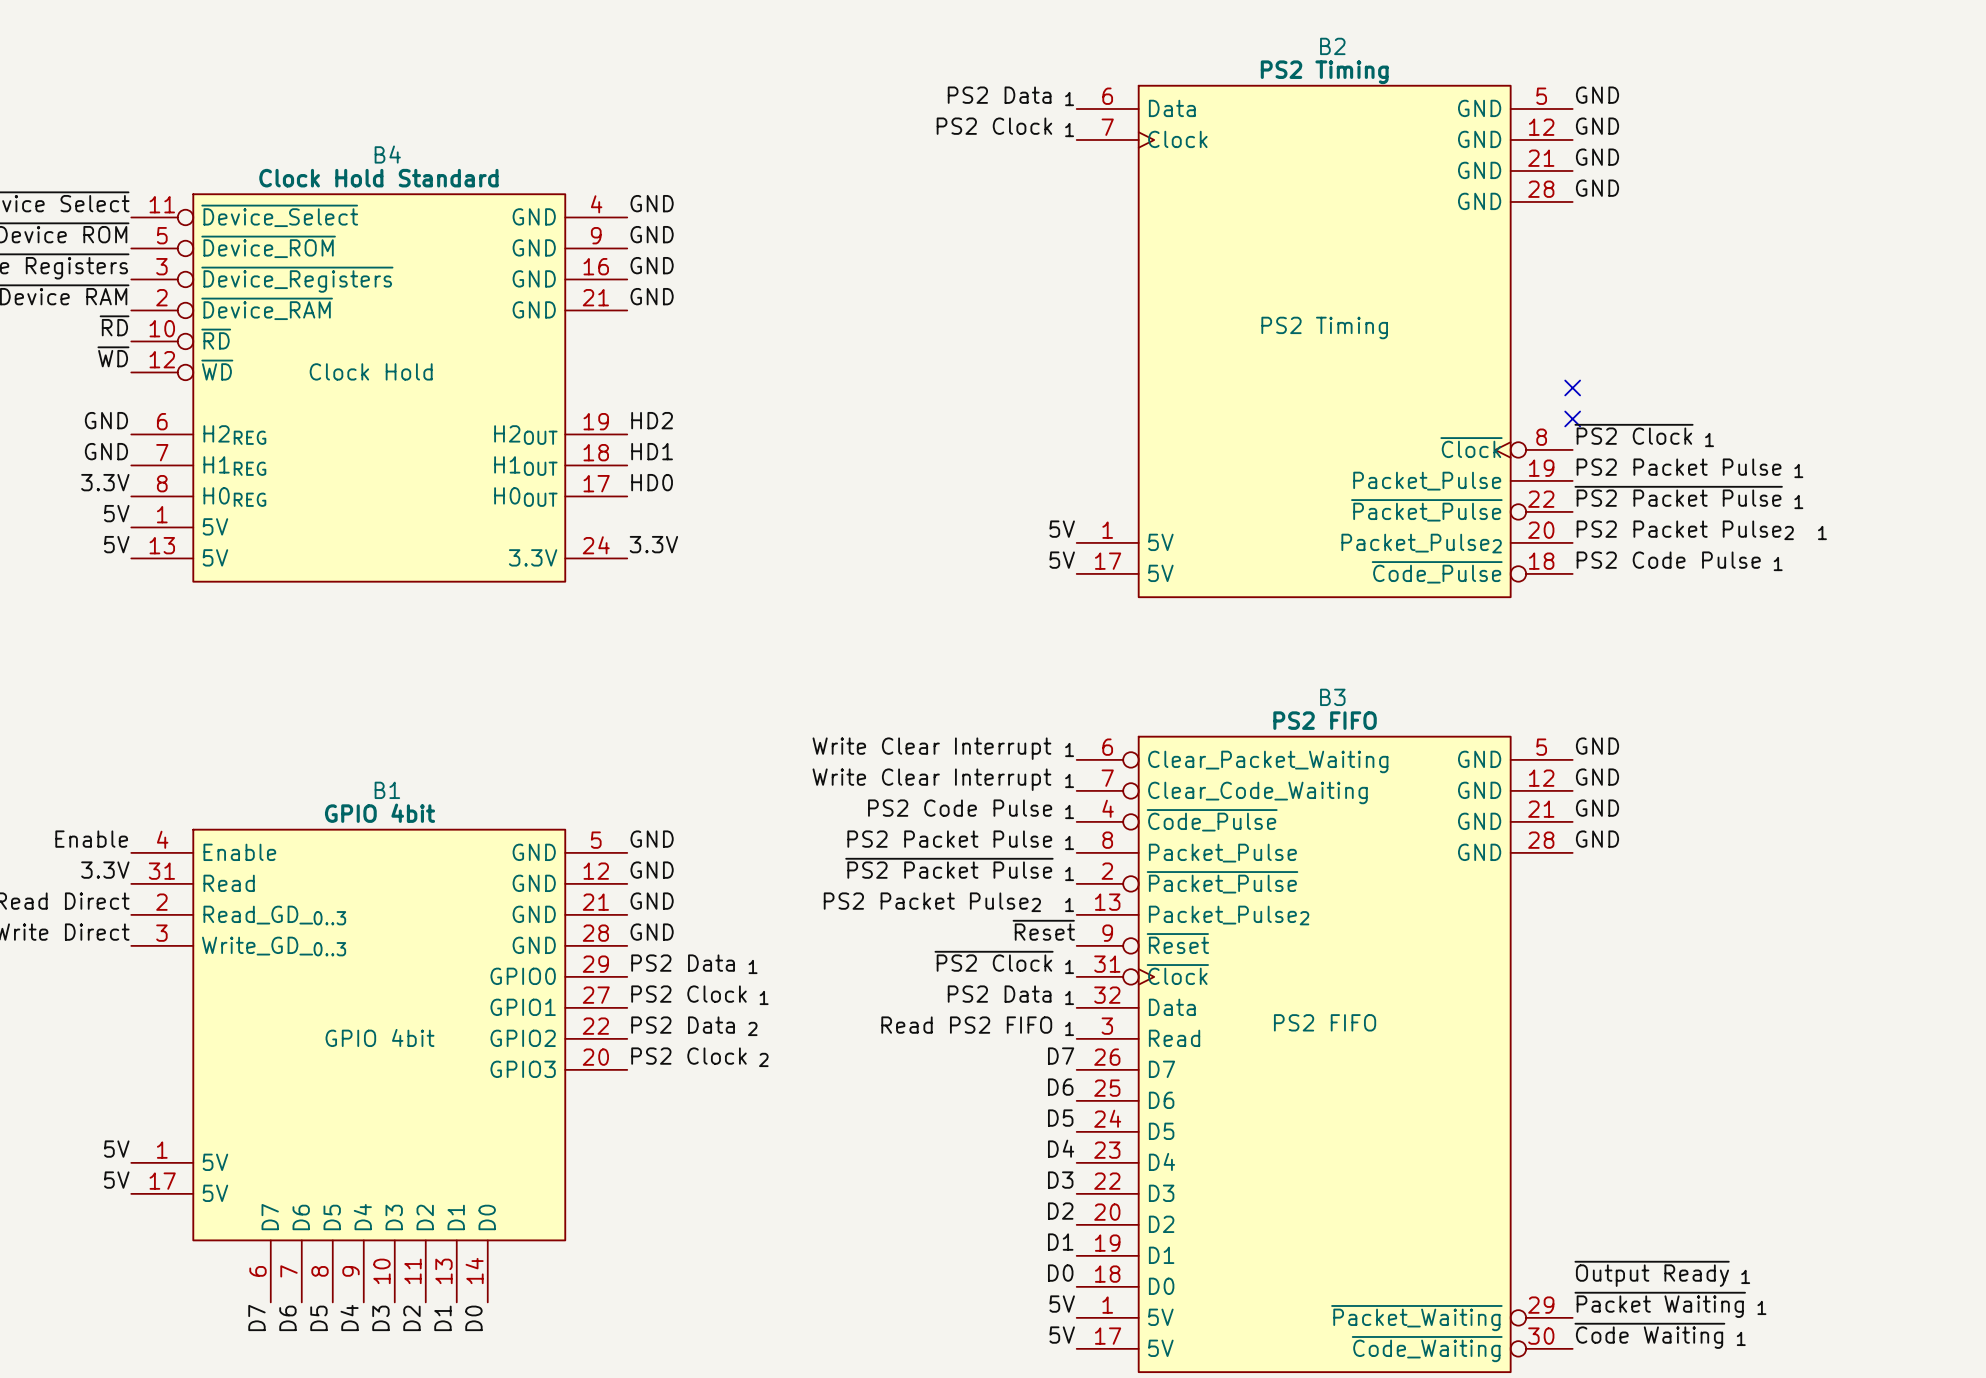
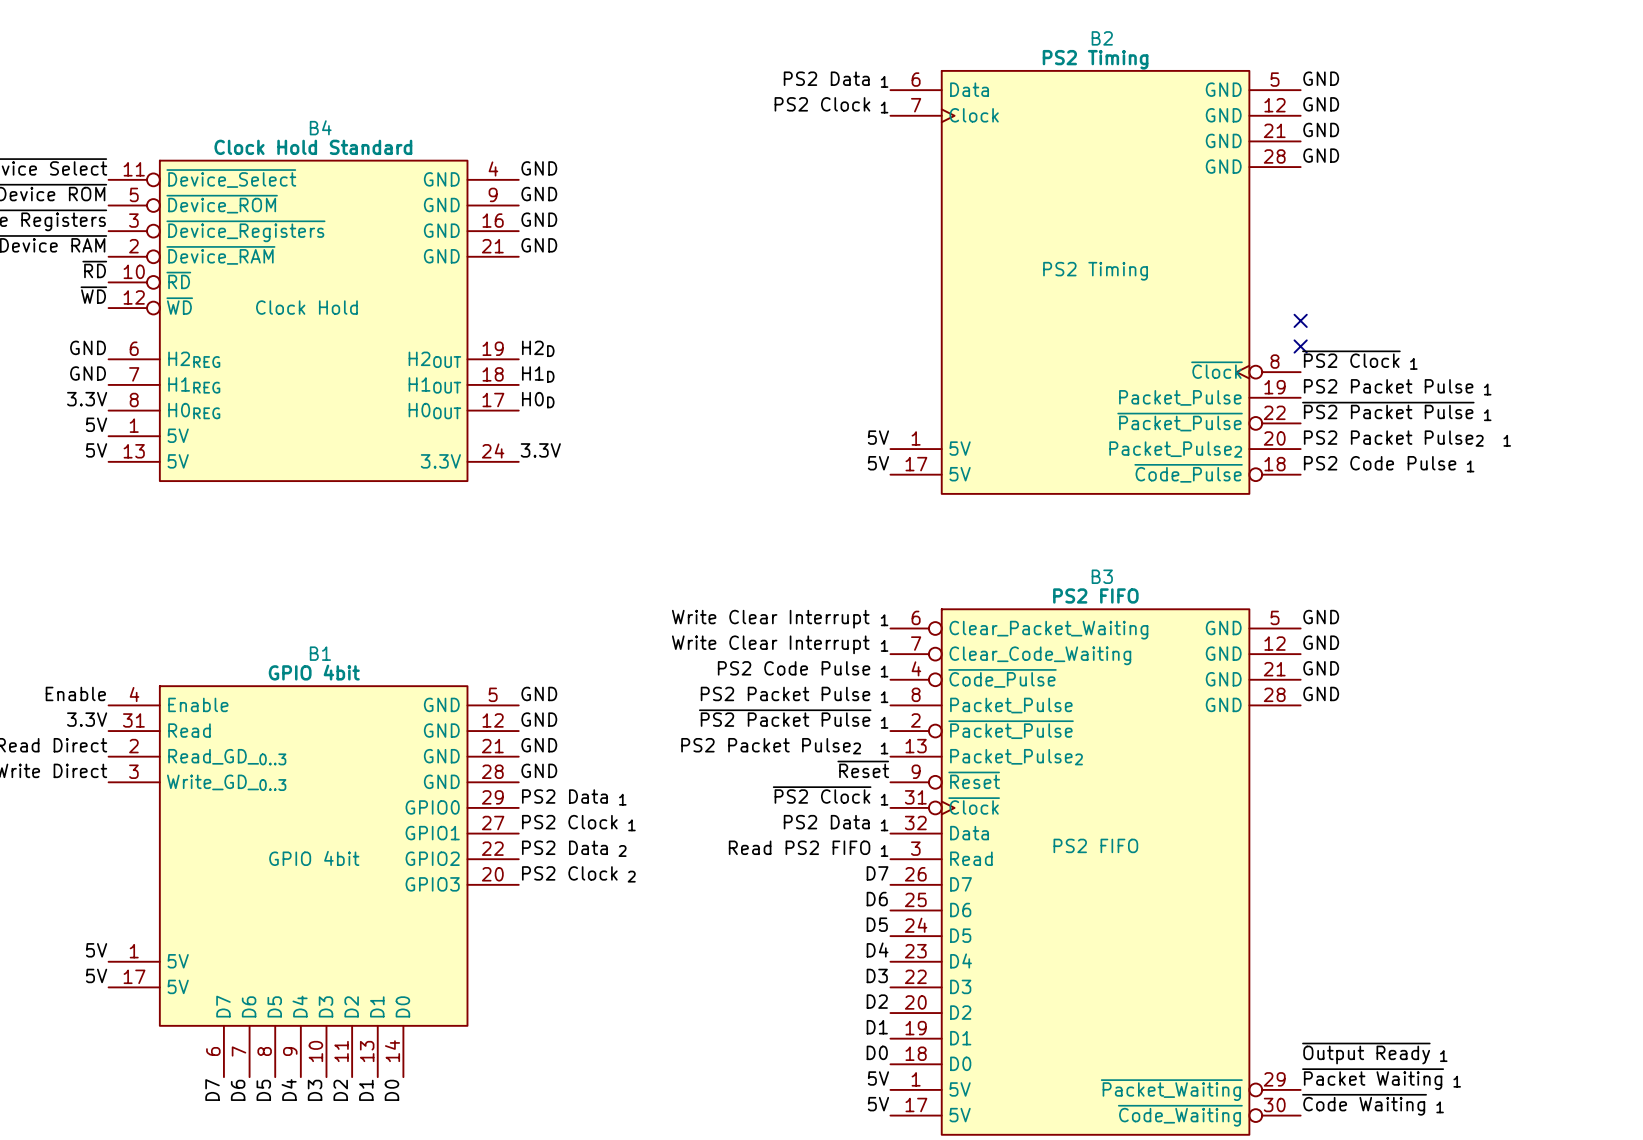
label: HD2 (652, 420) -> H2D (538, 348)
label: HD1 (652, 451) -> H1D (538, 374)
label: HD0 (652, 482) -> H0D (538, 400)

